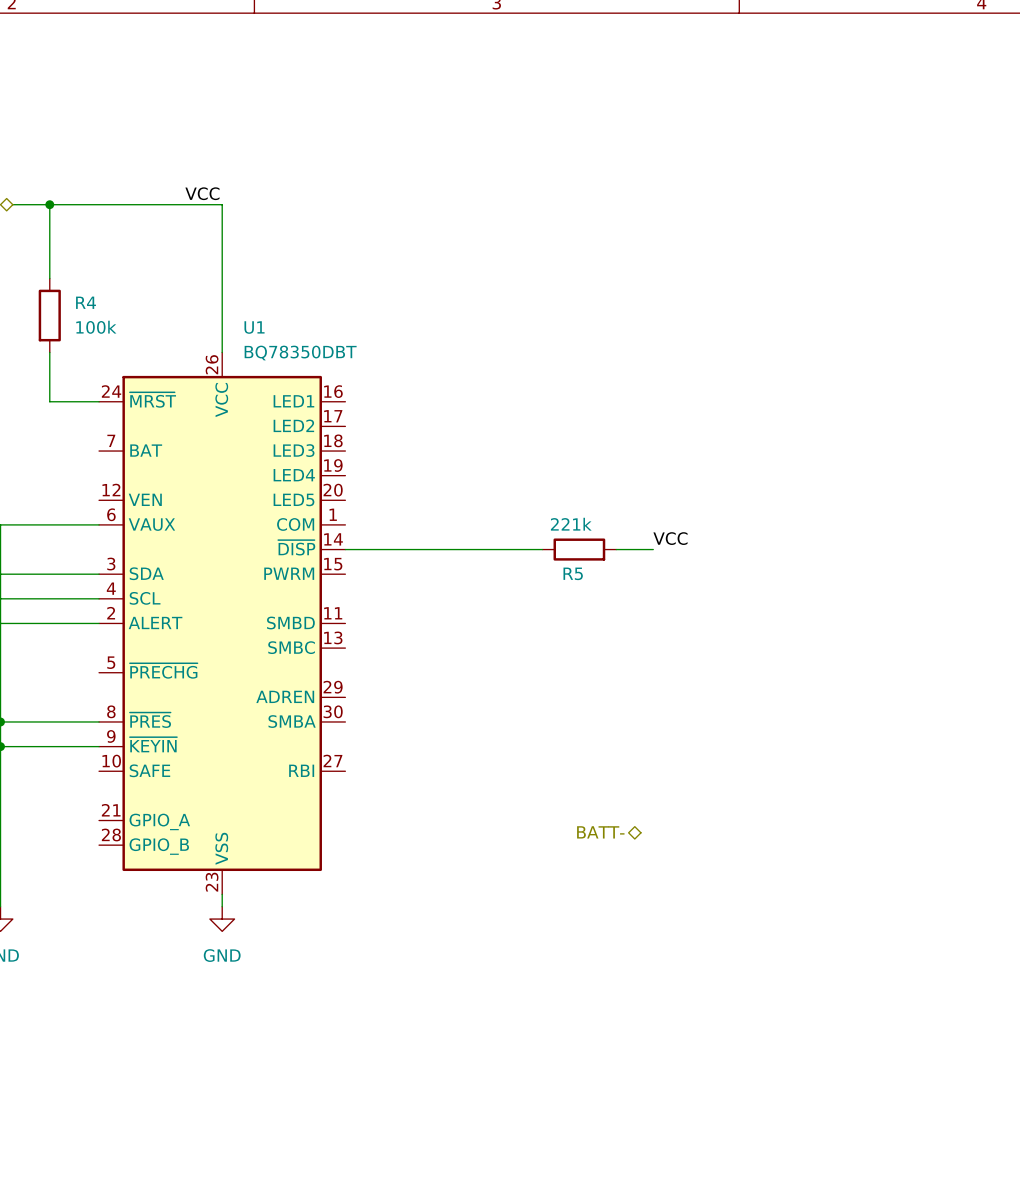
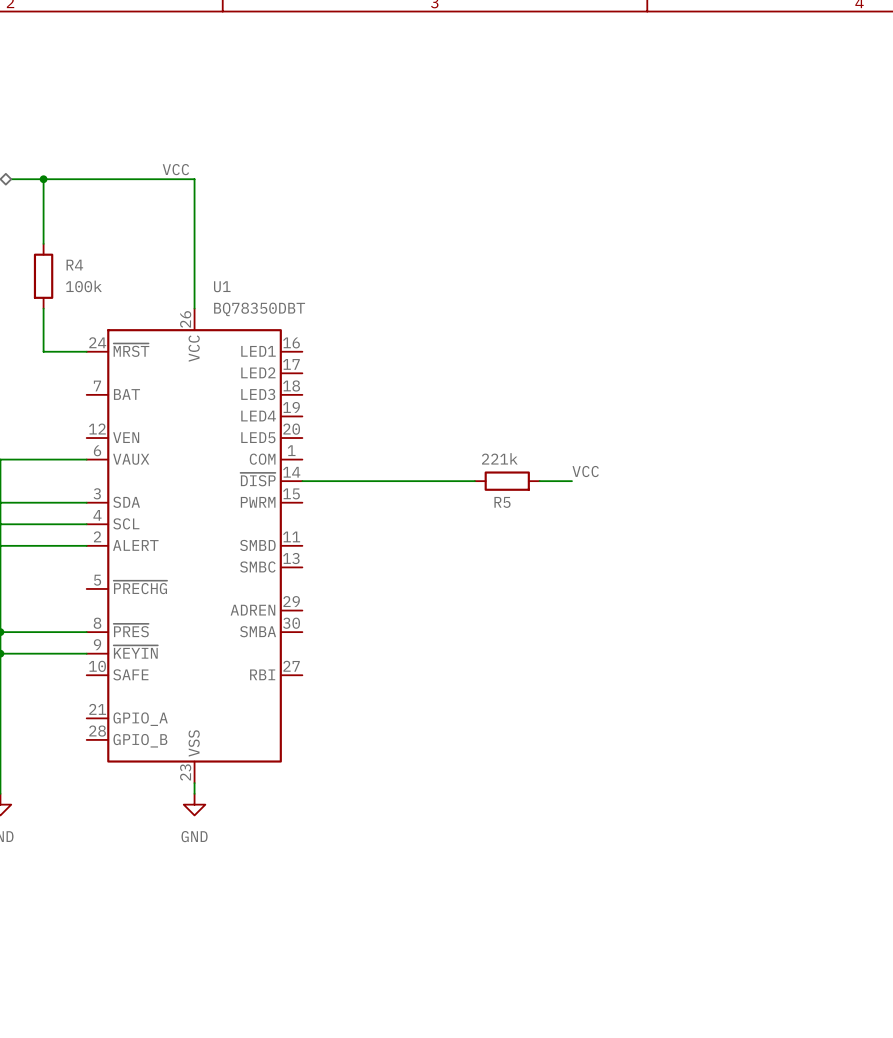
hierarchical label: BATT- (600, 832) -> none

